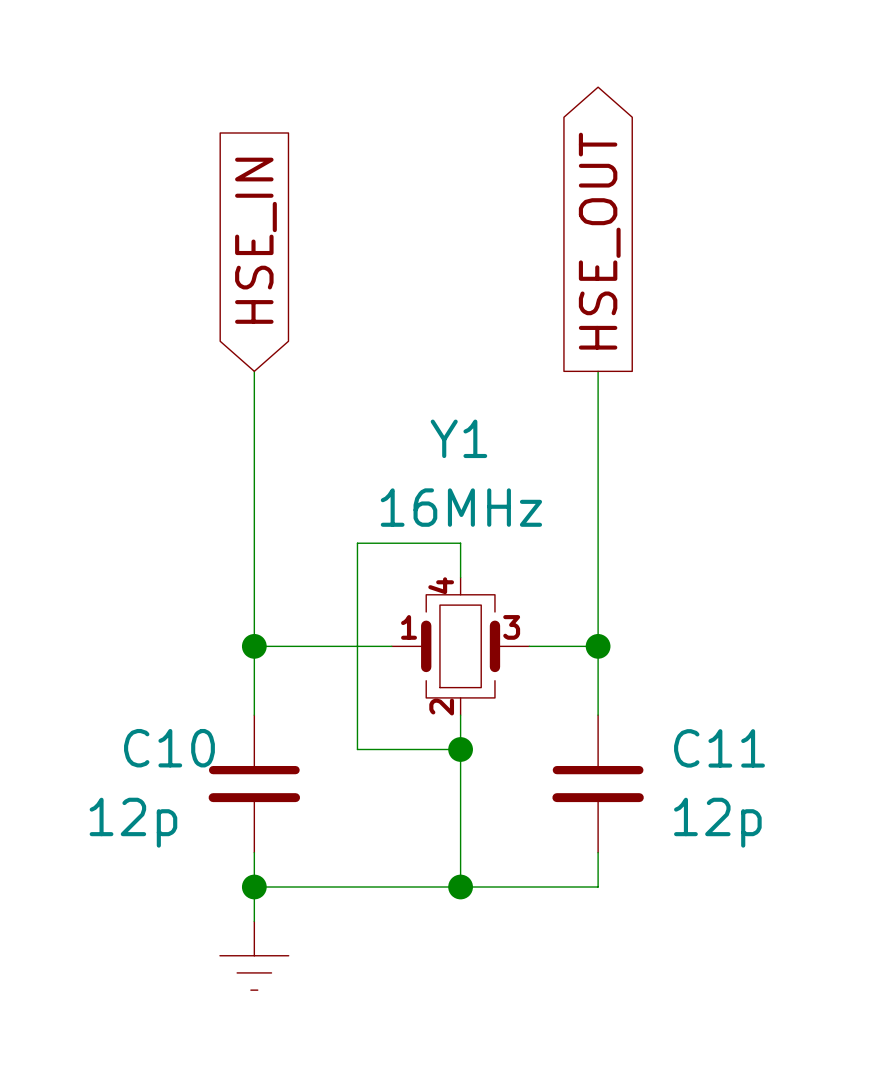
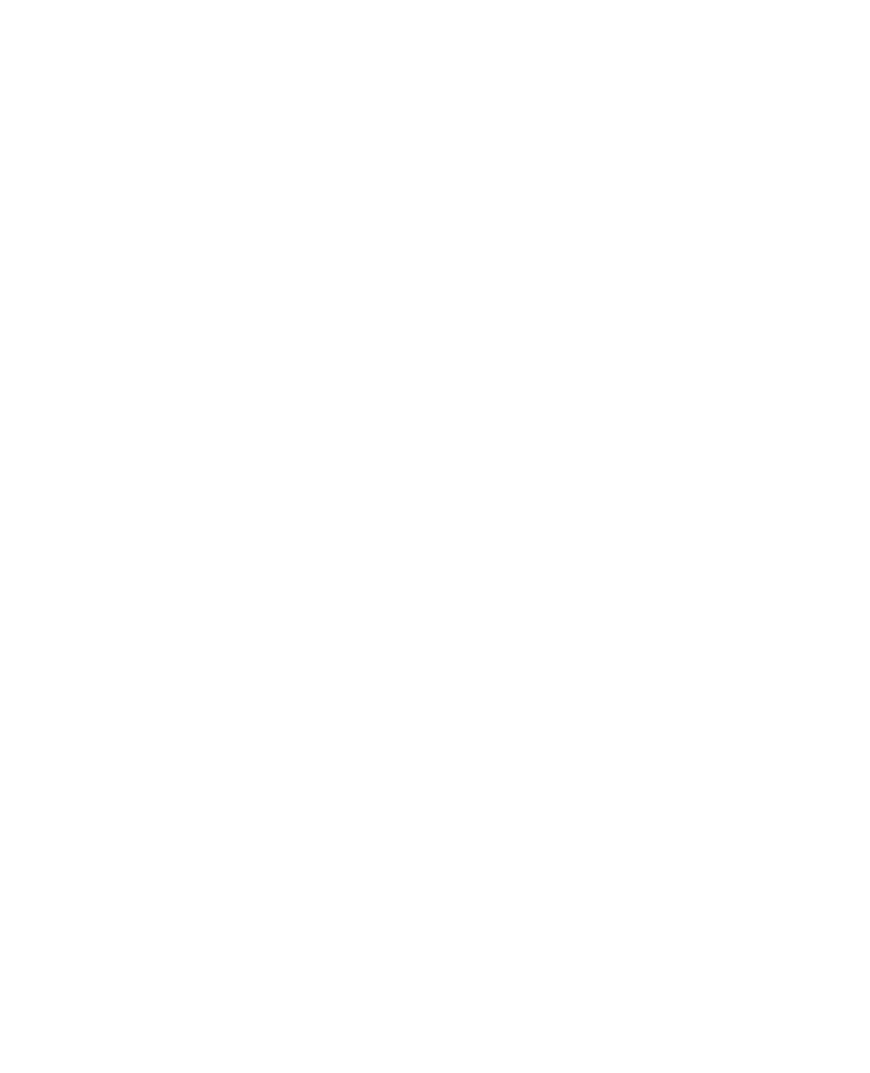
global label: HSE_IN (255, 240) -> none
global label: HSE_OUT (599, 241) -> none
wire: (254, 371) (254, 715) -> none
wire: (598, 371) (598, 715) -> none
wire: (460, 577) (460, 543) (357, 543) (357, 749) (460, 749) -> none
wire: (254, 646) (391, 646) -> none
junction: (254, 646) -> none
Y1: 16MHz (460, 646) -> none
wire: (529, 646) (598, 646) -> none
junction: (598, 646) -> none
wire: (460, 715) (460, 887) -> none
junction: (460, 749) -> none
C10: 12p (254, 783) -> none
C11: 12p (598, 783) -> none
wire: (254, 852) (254, 921) -> none
wire: (598, 852) (598, 887) (254, 887) -> none
junction: (254, 887) -> none
junction: (460, 887) -> none
power symbol: (254, 955) -> none

